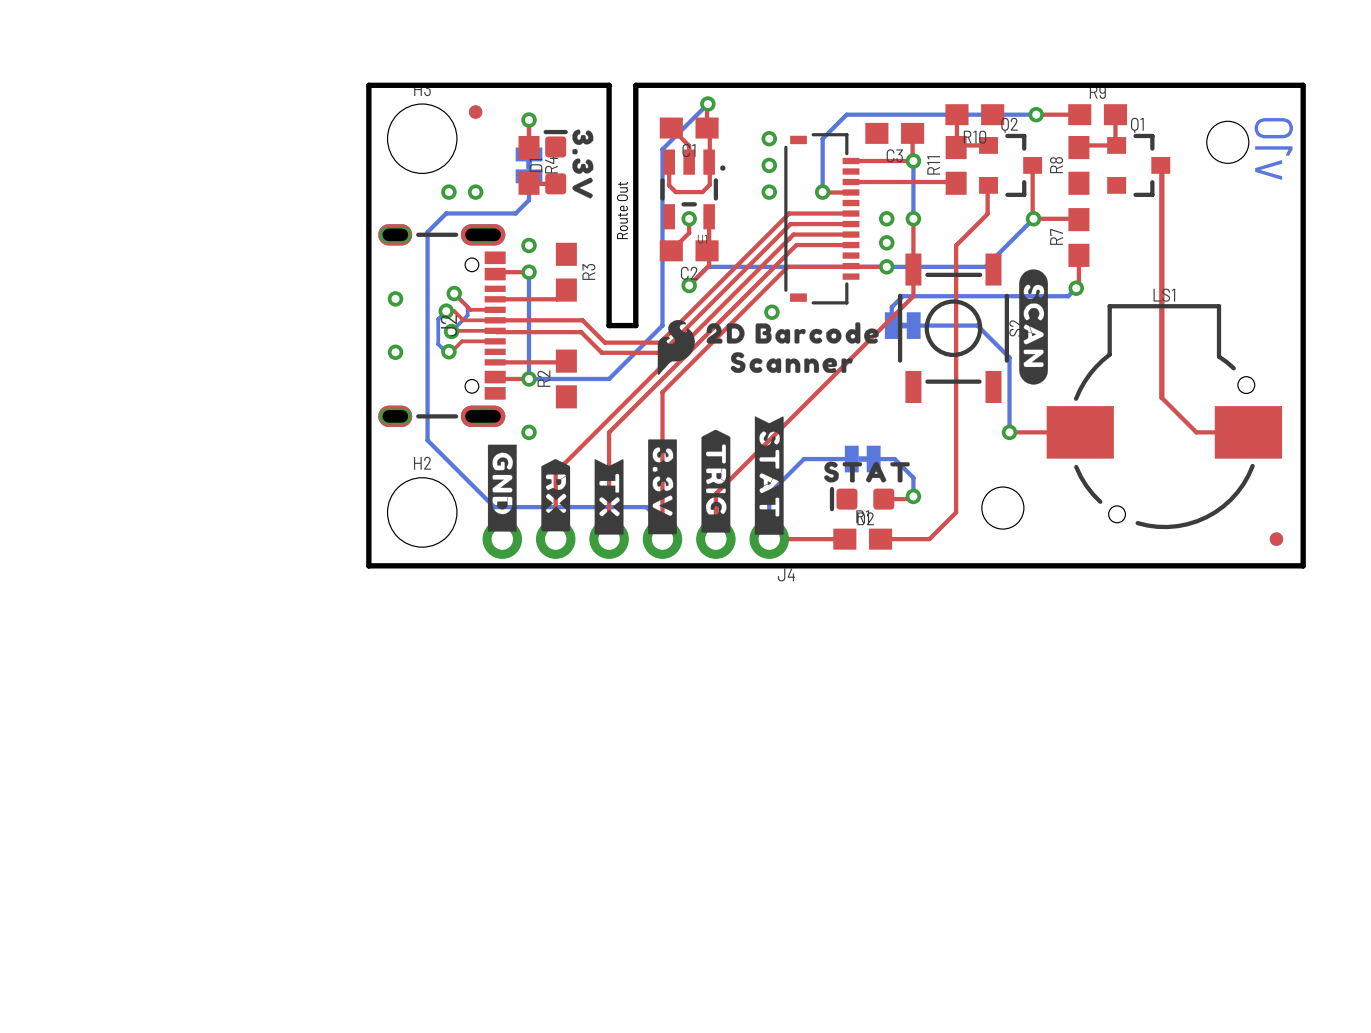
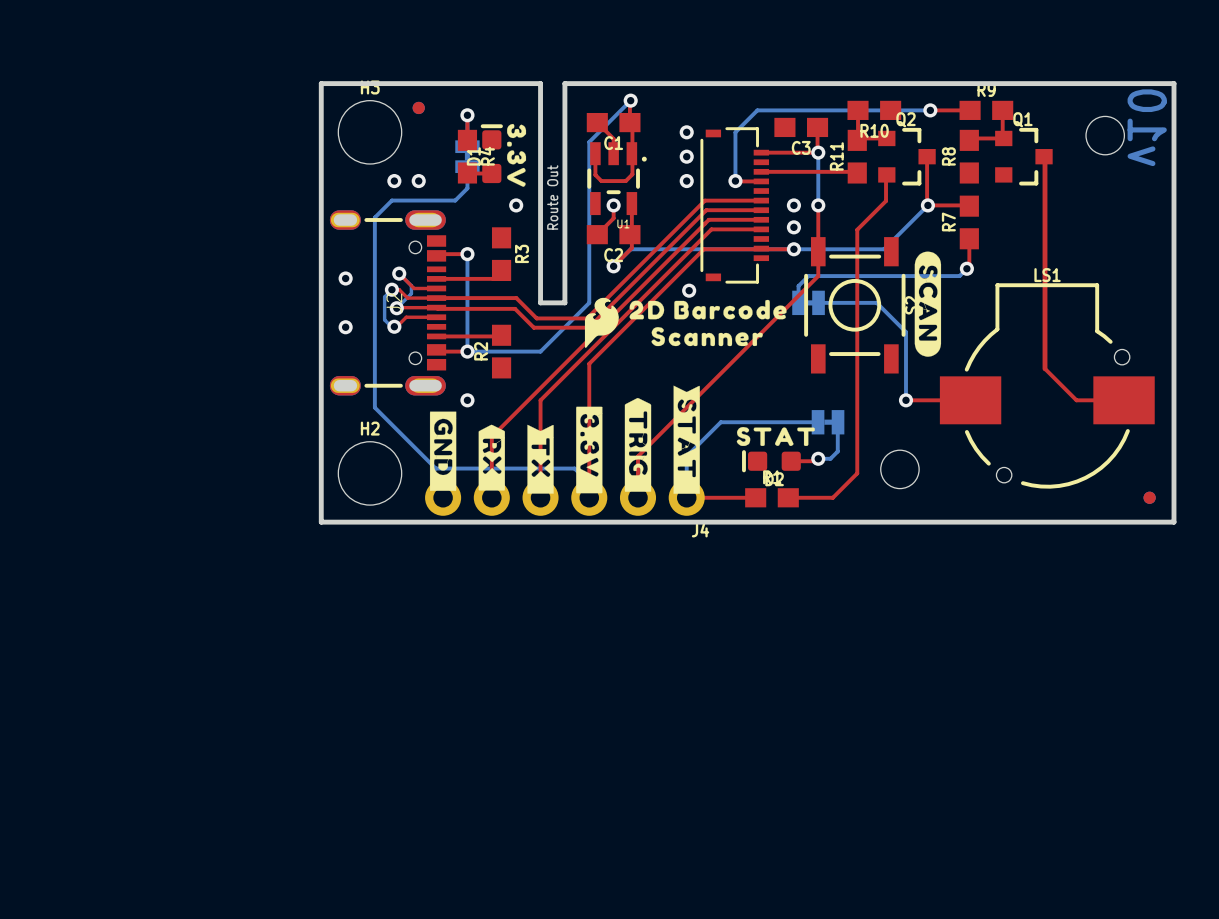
via position: (529, 245) -> (516, 205)
bottom track: (803, 459) (851, 459) -> (718, 424) (720, 422) (818, 422)
part position: (862, 459) -> (828, 422)
bottom track: (873, 459) (894, 459) (913, 477) (913, 496) -> (837, 422) (837, 451) (830, 458) (818, 458)

